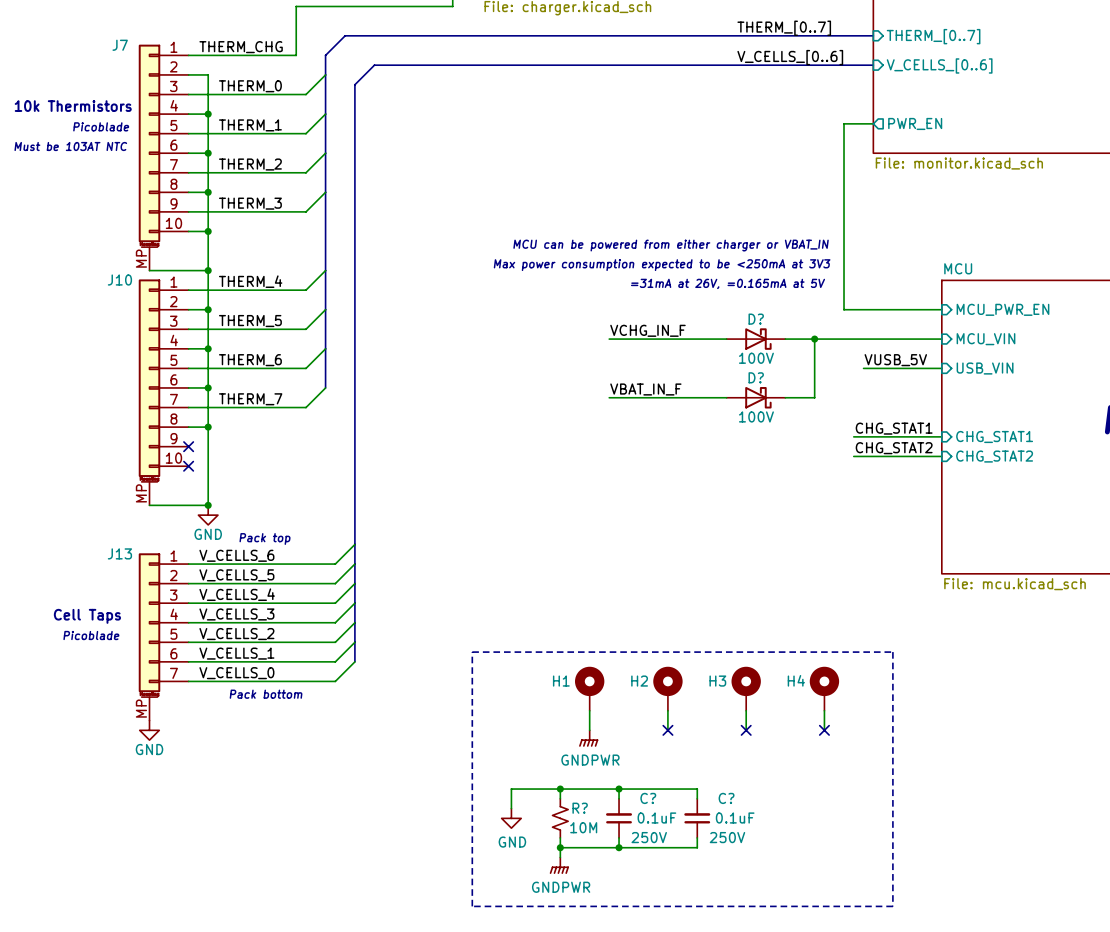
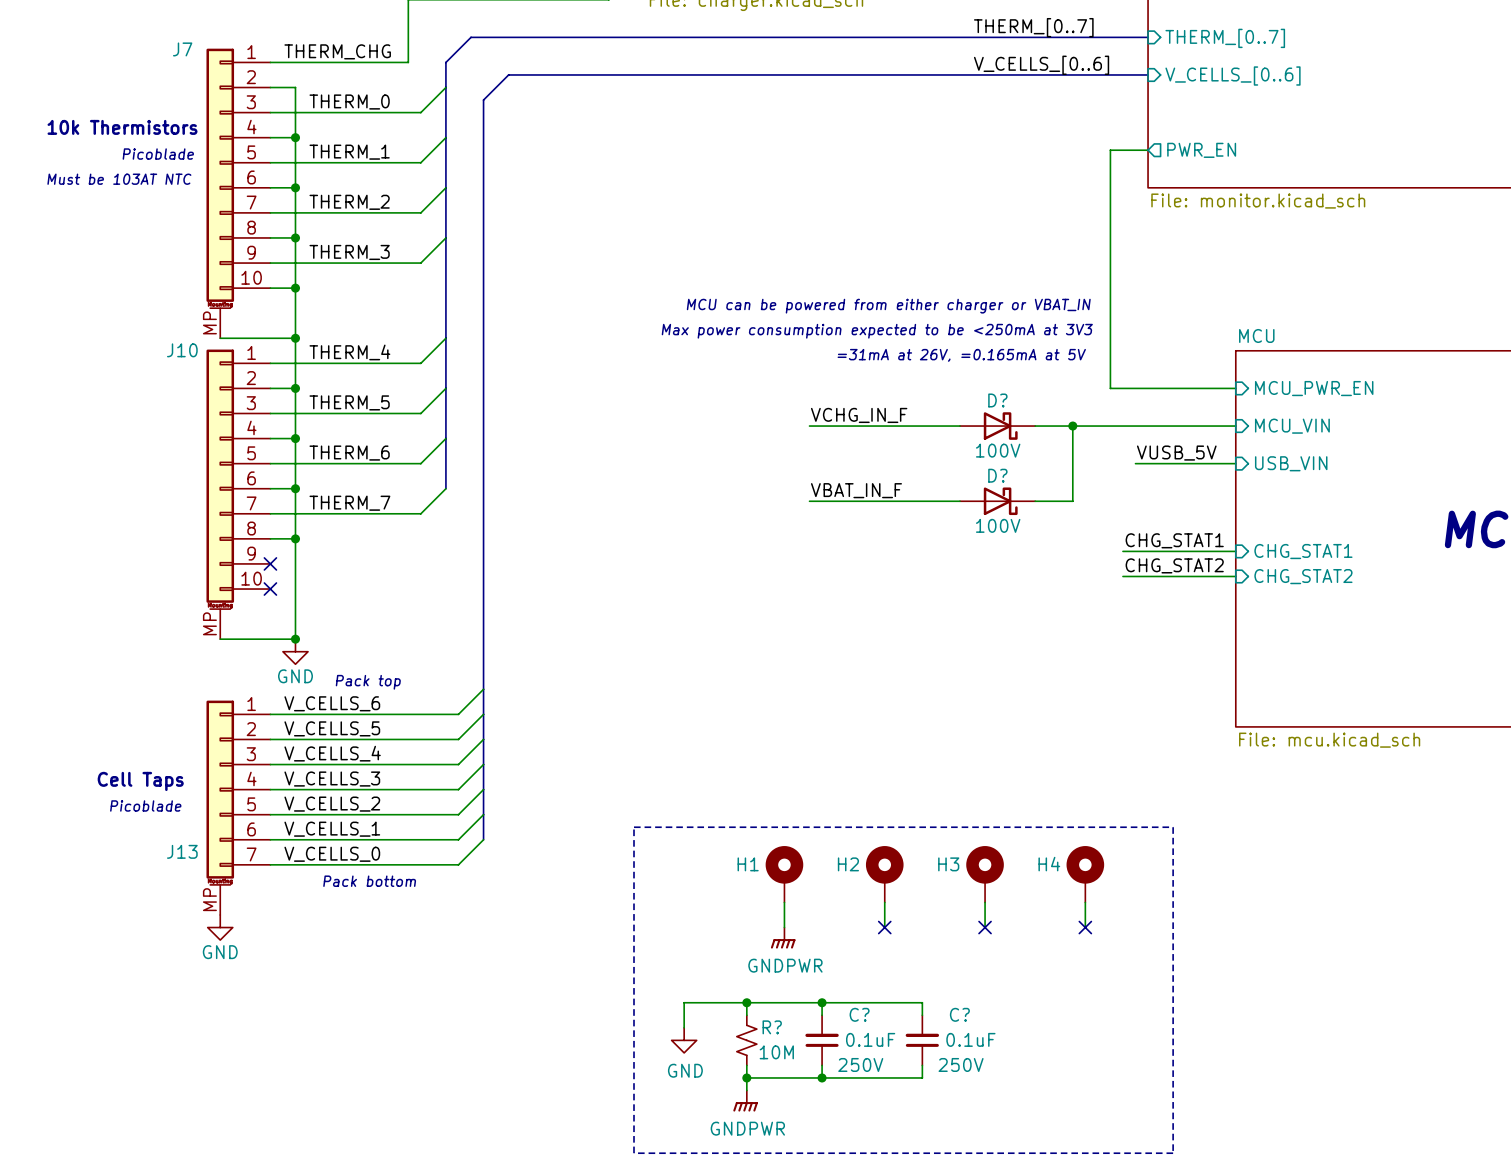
J13 name position: J13 (119, 553) -> J13 (182, 851)

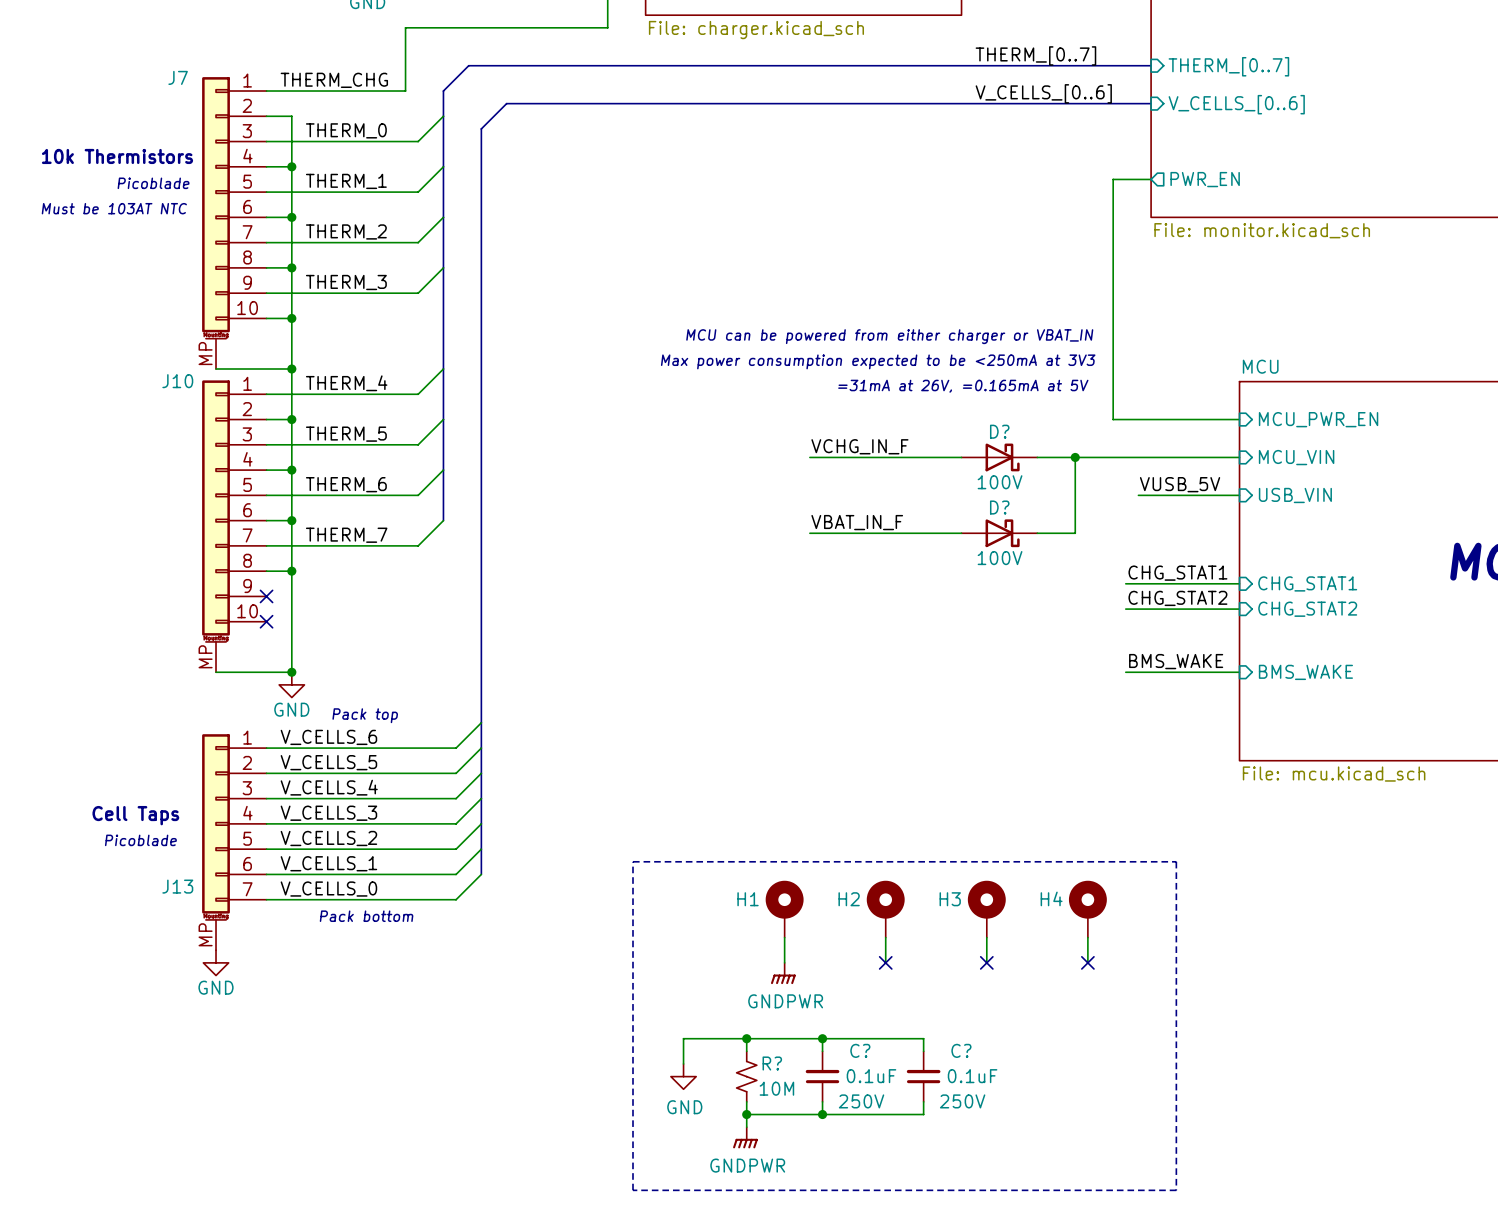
label: none -> BMS_WAKE (1176, 661)
wire: none -> (1125, 672) (1239, 672)
sheet pin: none -> BMS_WAKE (1305, 672)

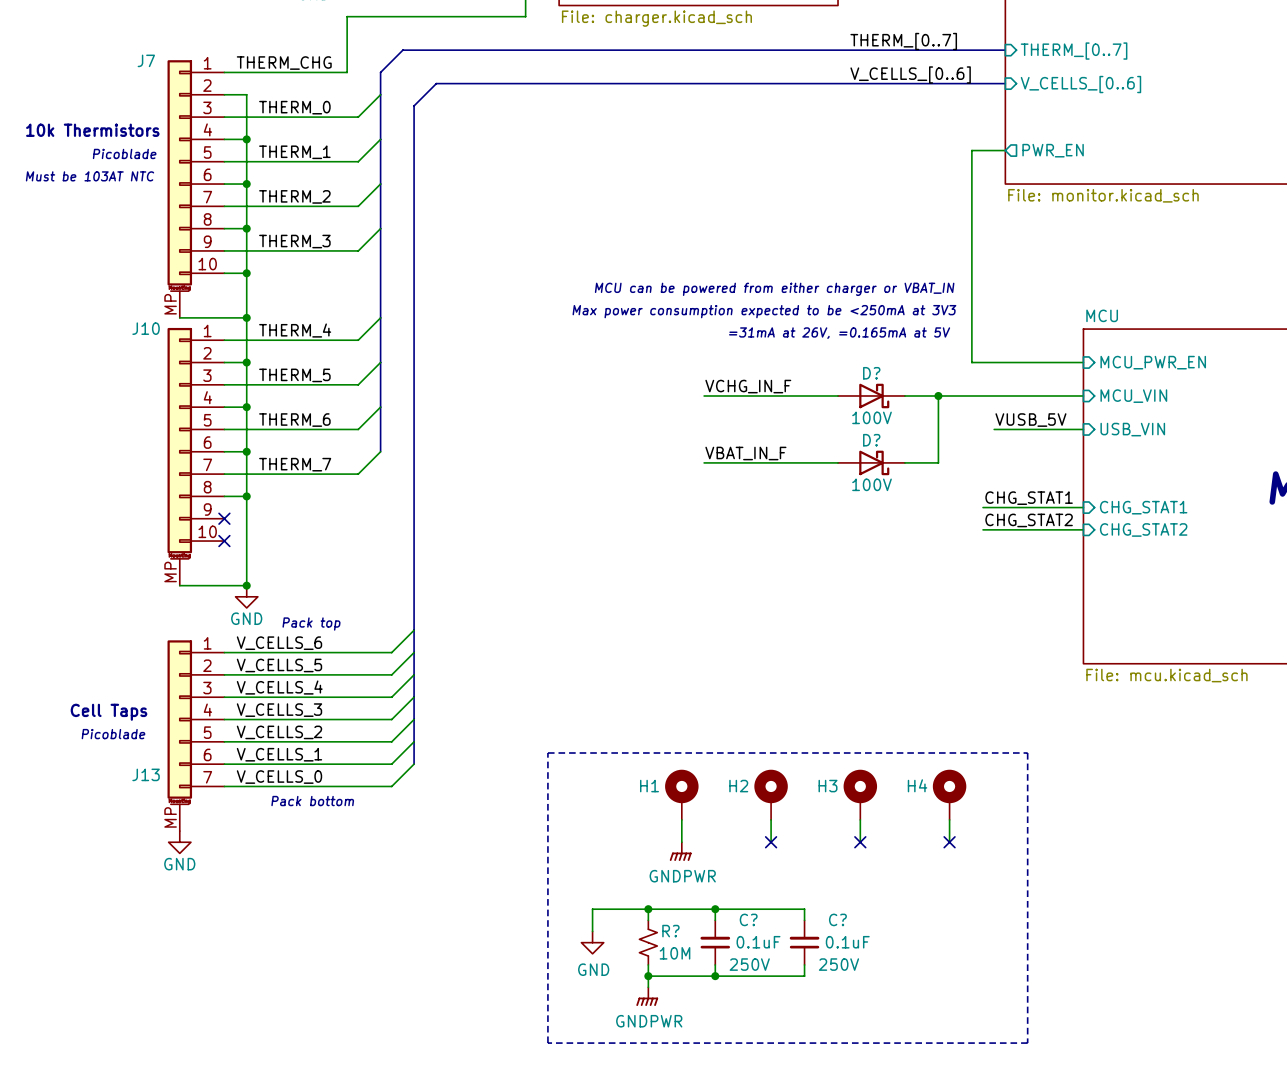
label: BMS_WAKE (1176, 661) -> none
wire: (1125, 672) (1239, 672) -> none
sheet pin: BMS_WAKE (1305, 672) -> none

